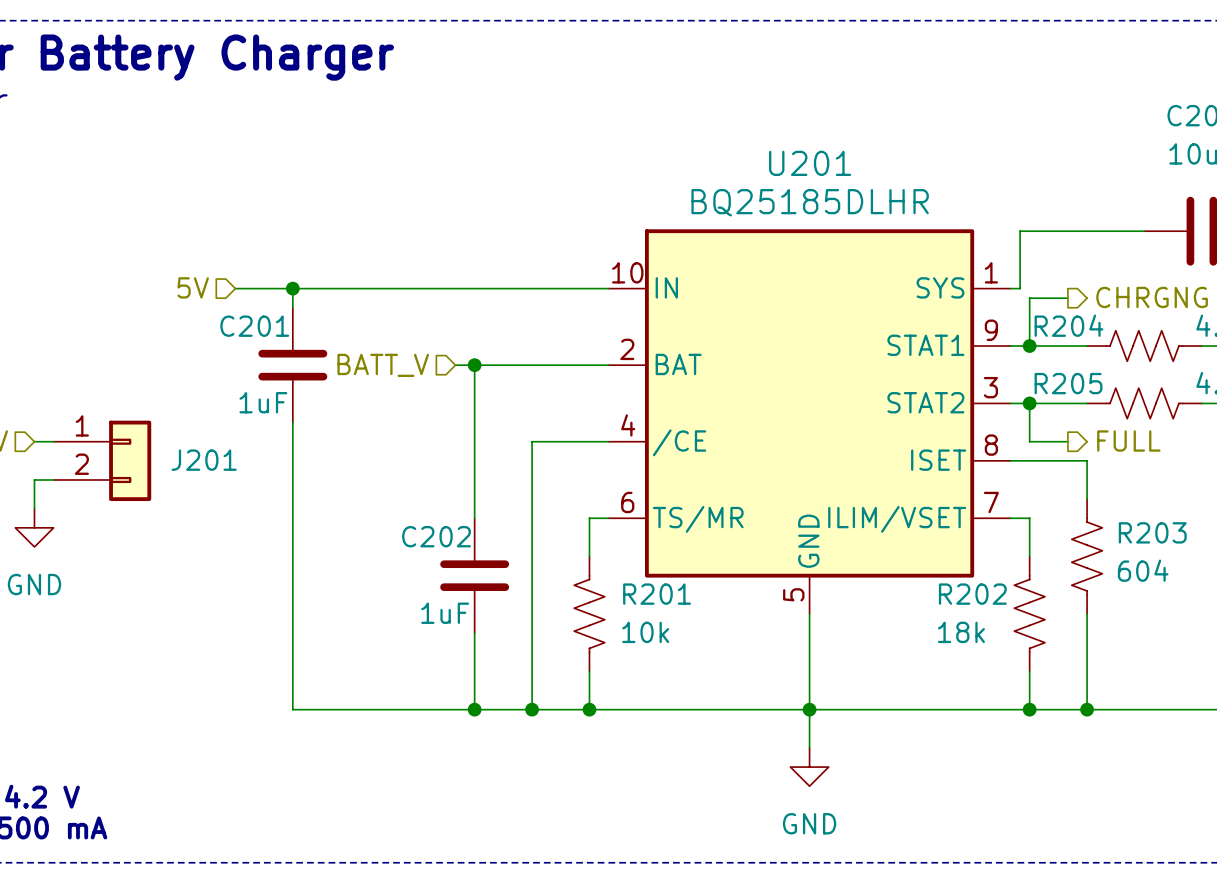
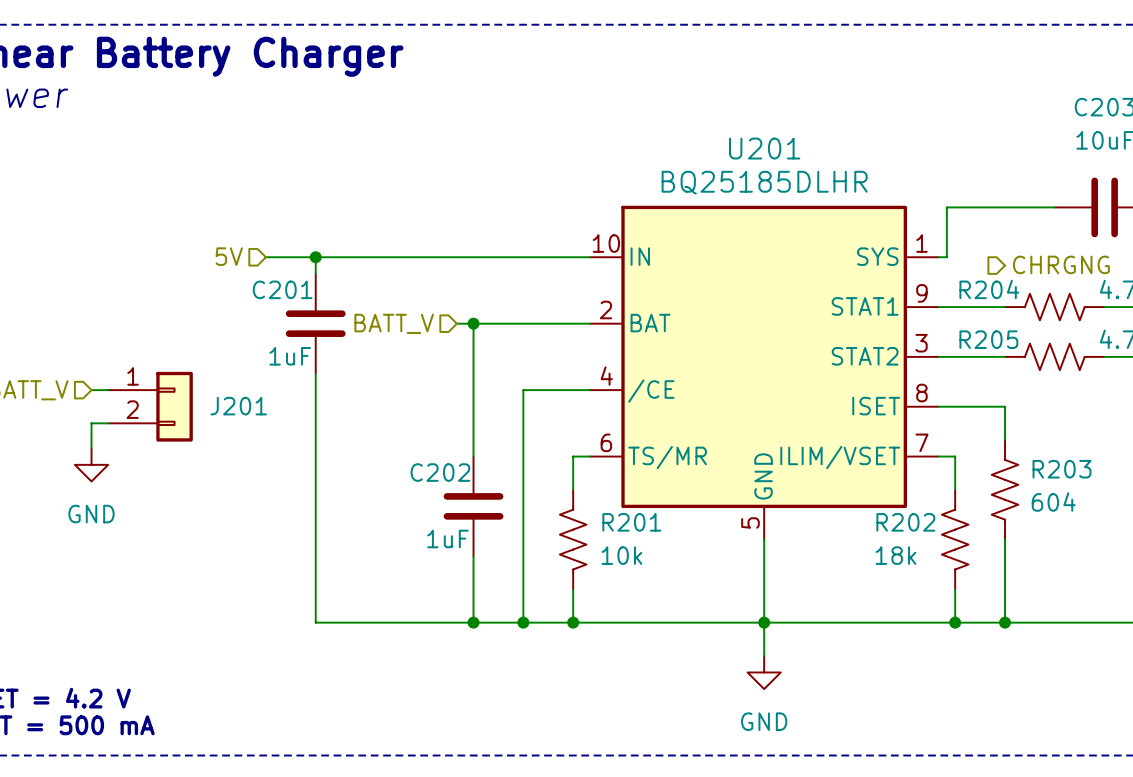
wire: (1067, 298) (1029, 298) (1029, 346) -> none
junction: (1029, 346) -> none
wire: (1029, 403) (1029, 441) (1067, 441) -> none
junction: (1029, 403) -> none
hierarchical label: FULL (1128, 441) -> none

